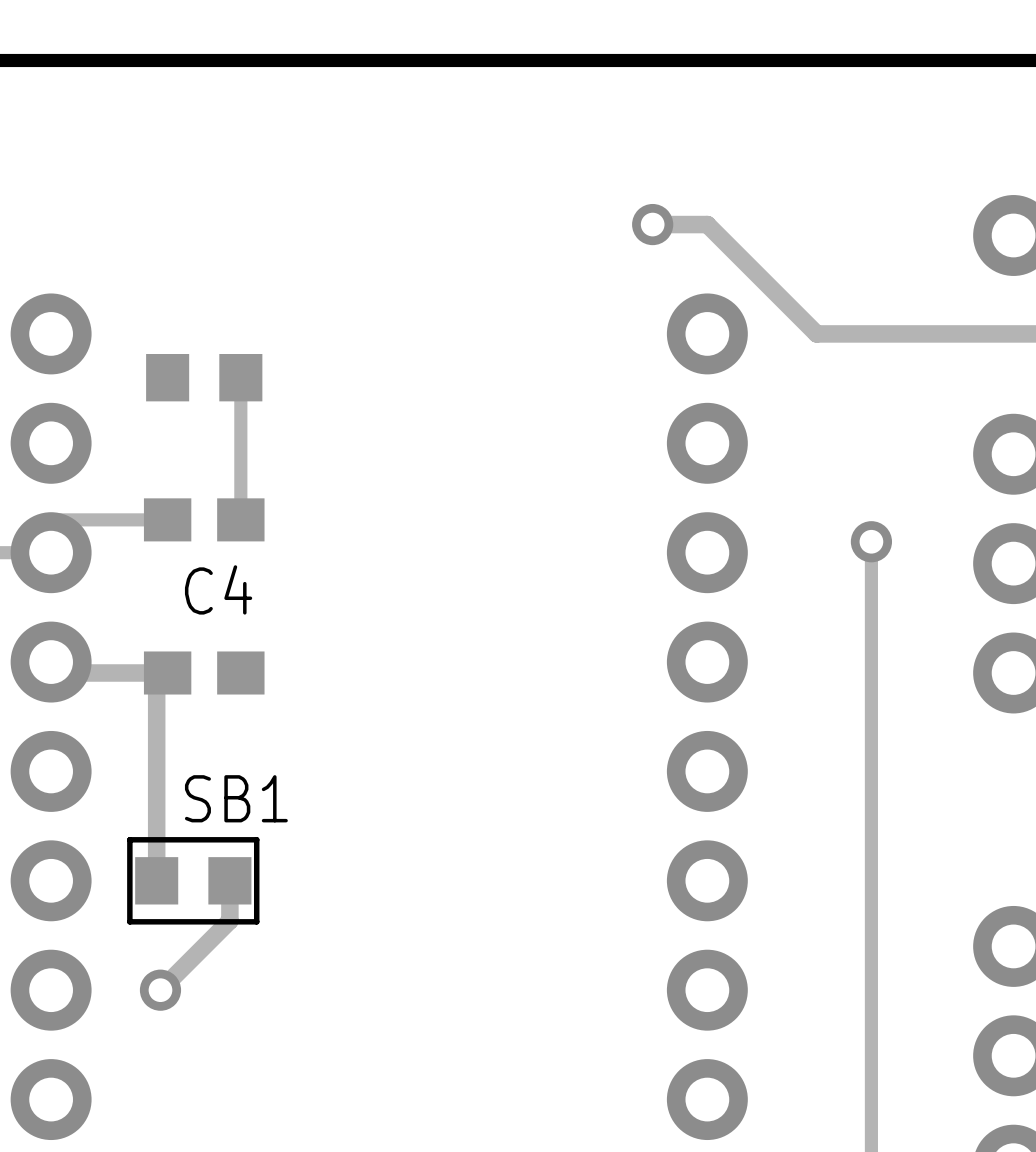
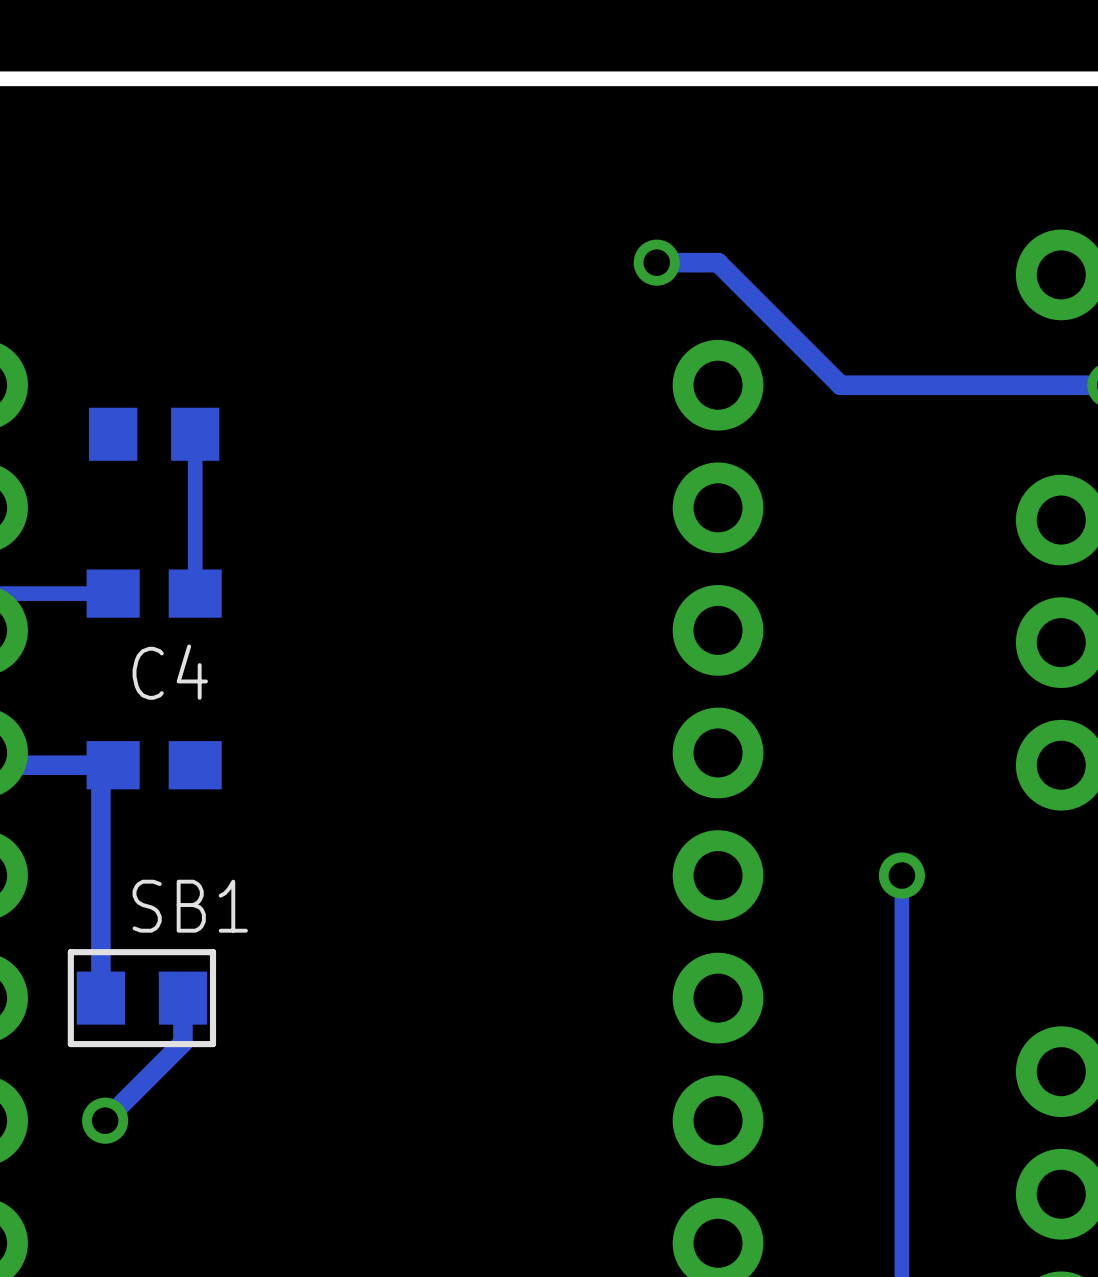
track: (871, 541) (871, 771) -> none
via position: (871, 541) -> (901, 875)

